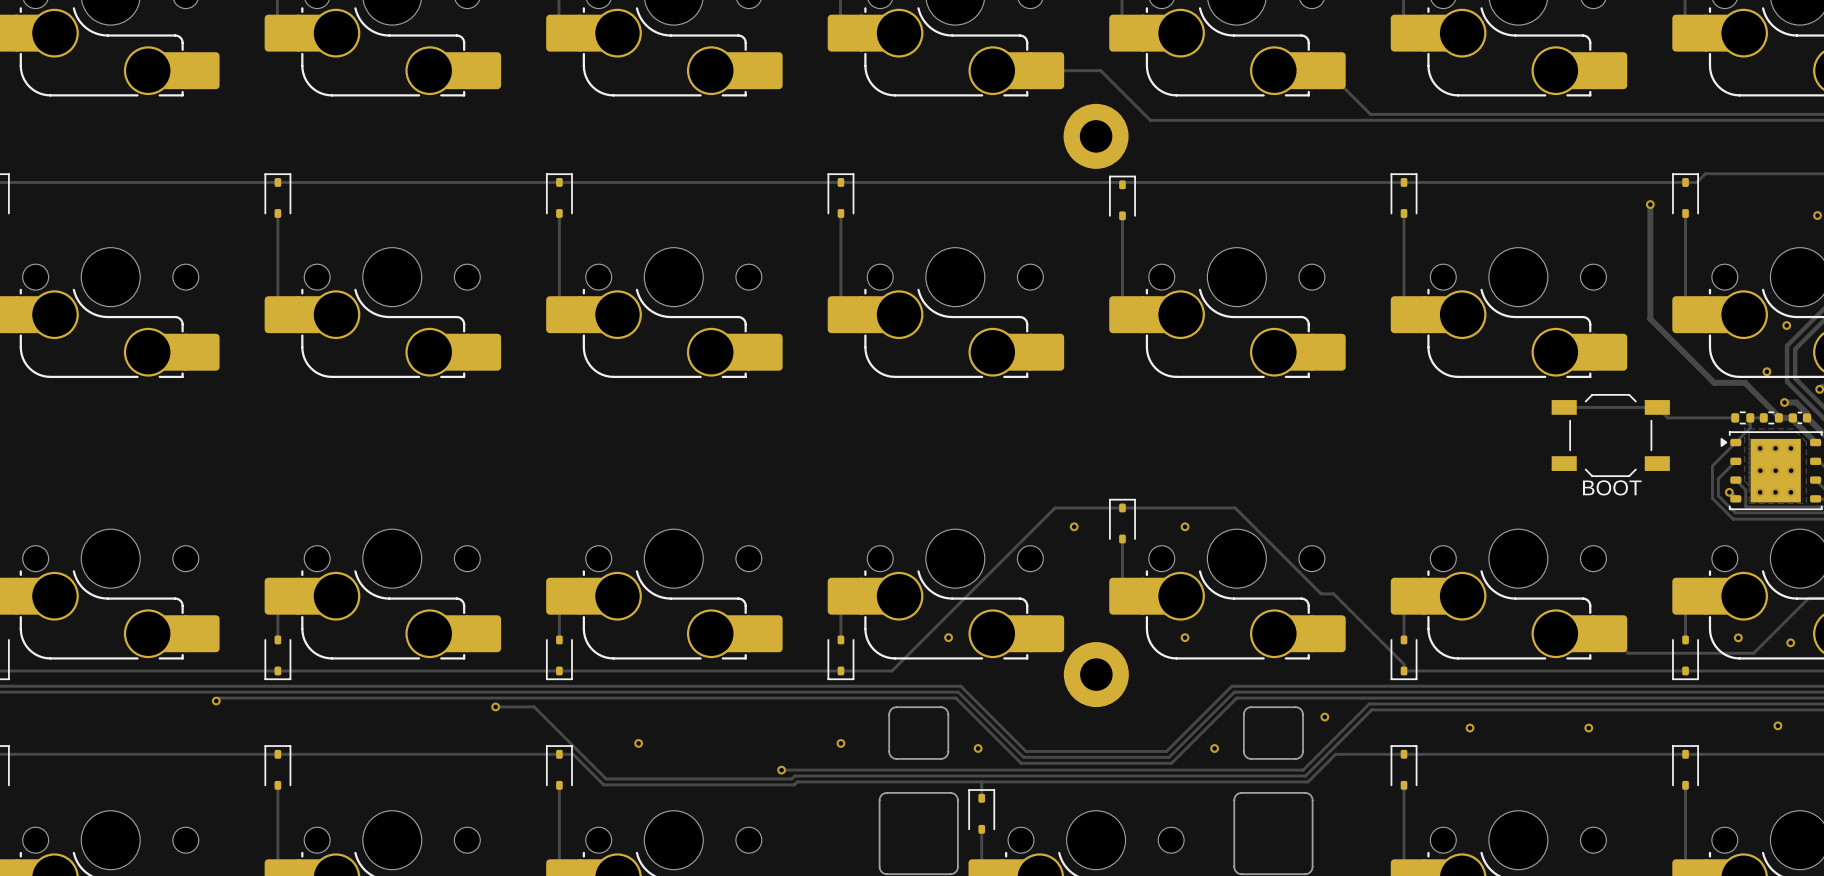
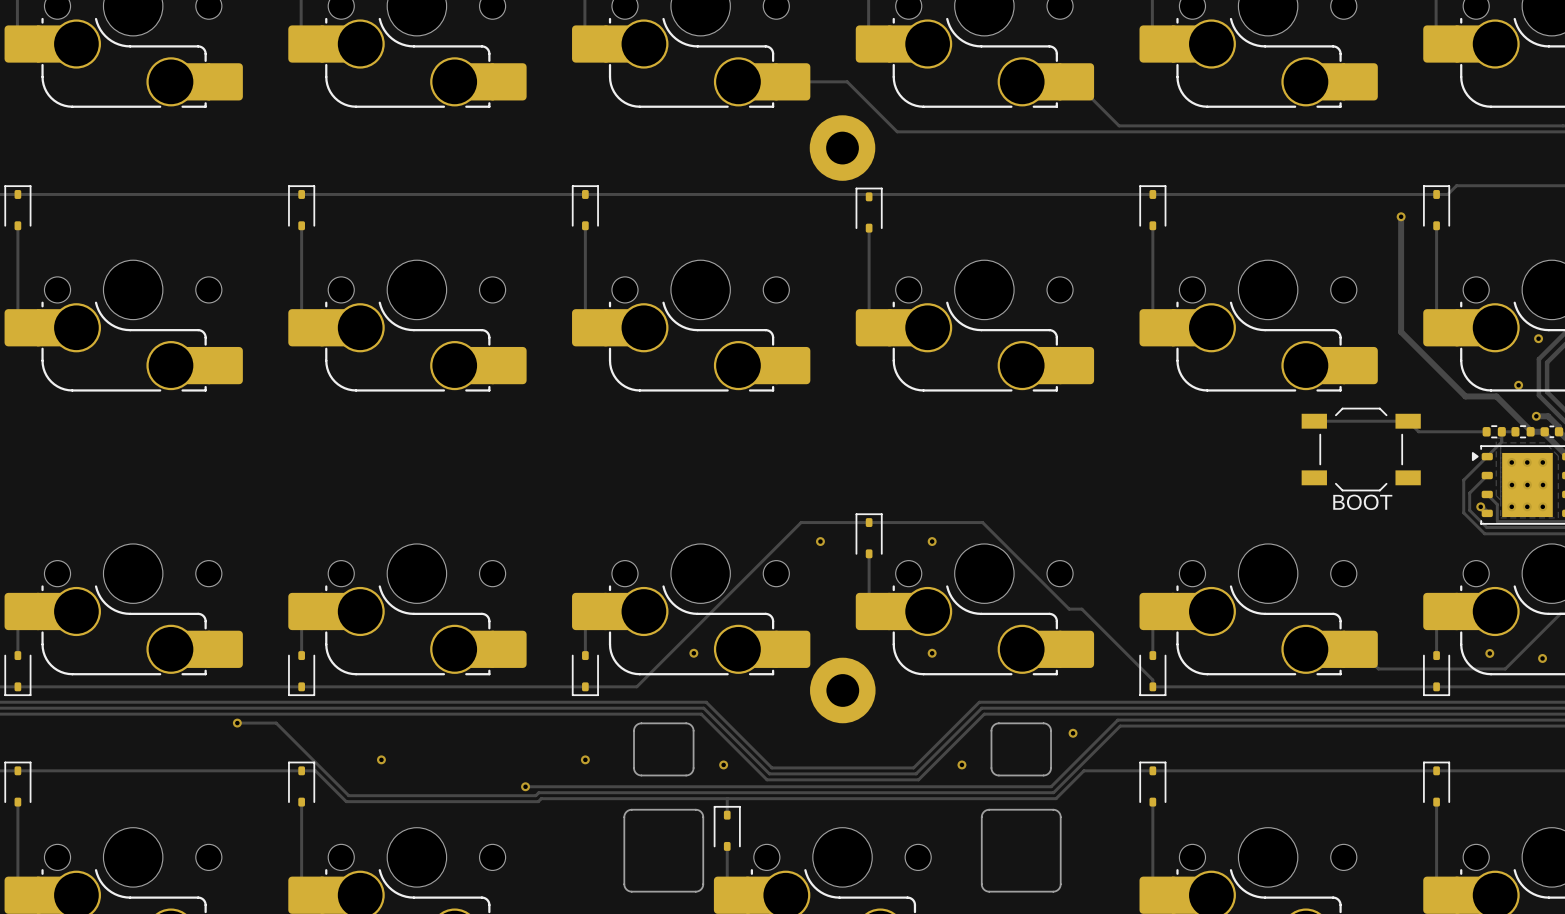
via: (1777, 725) -> none
via: (1470, 728) -> none
via: (1588, 728) -> none

